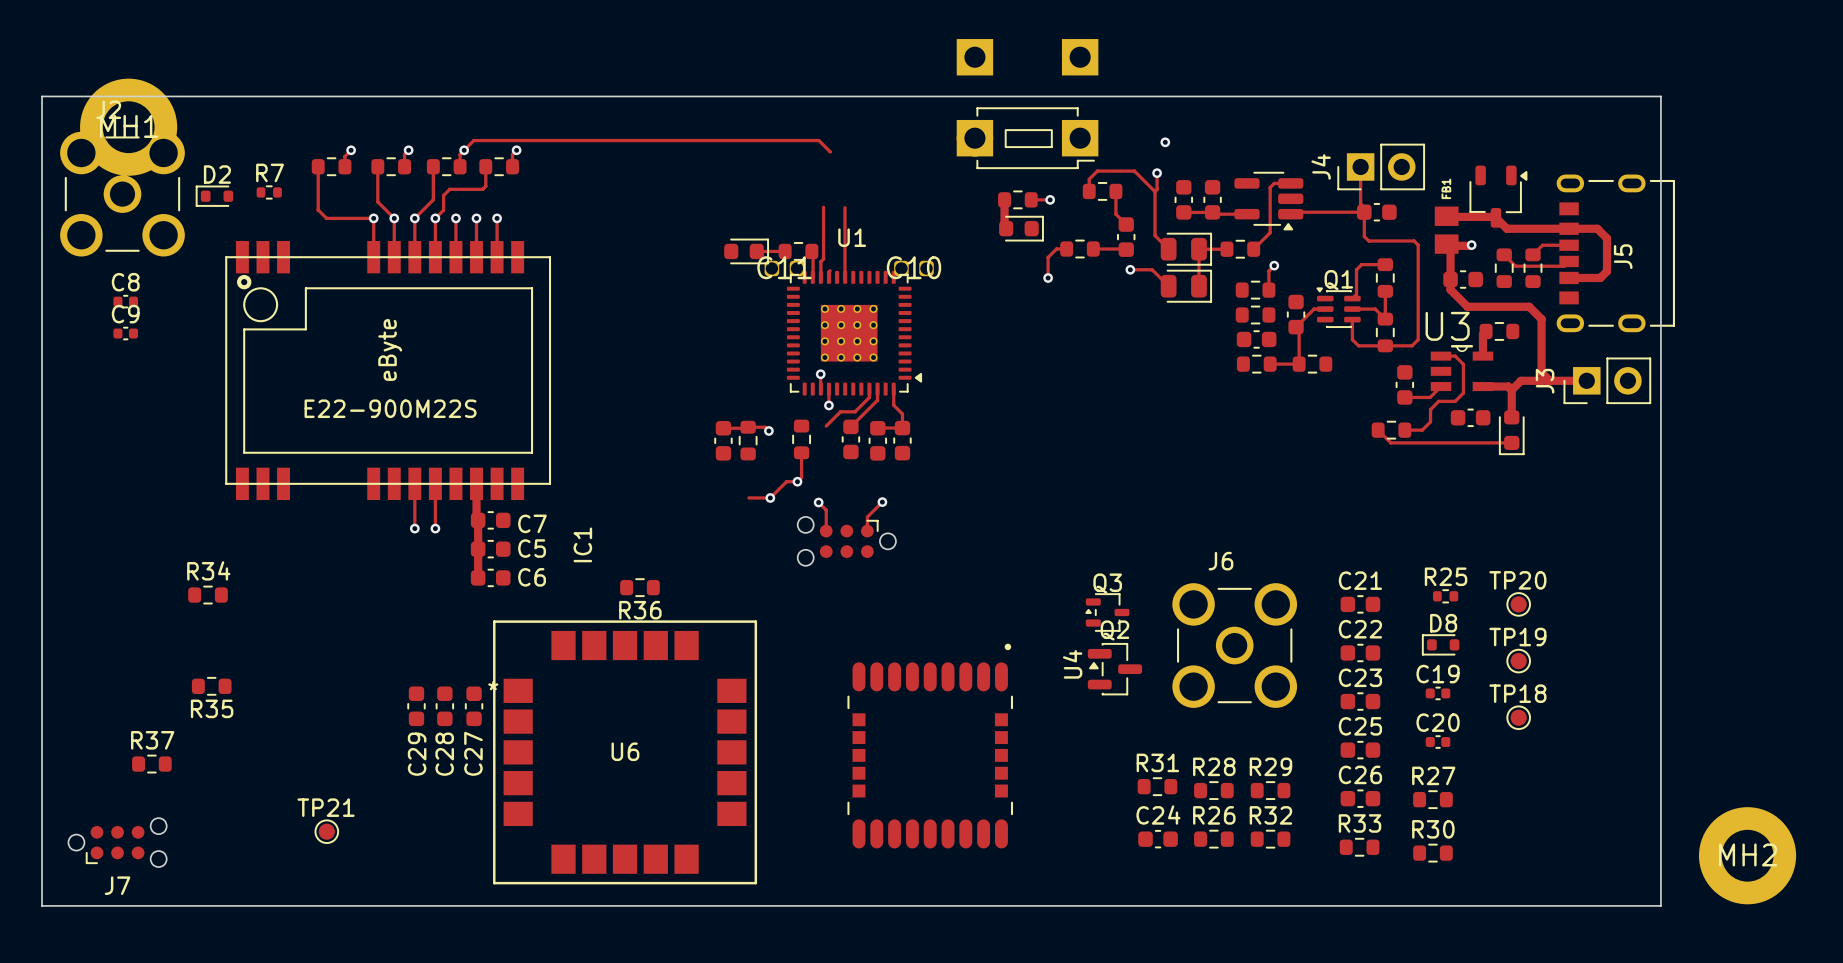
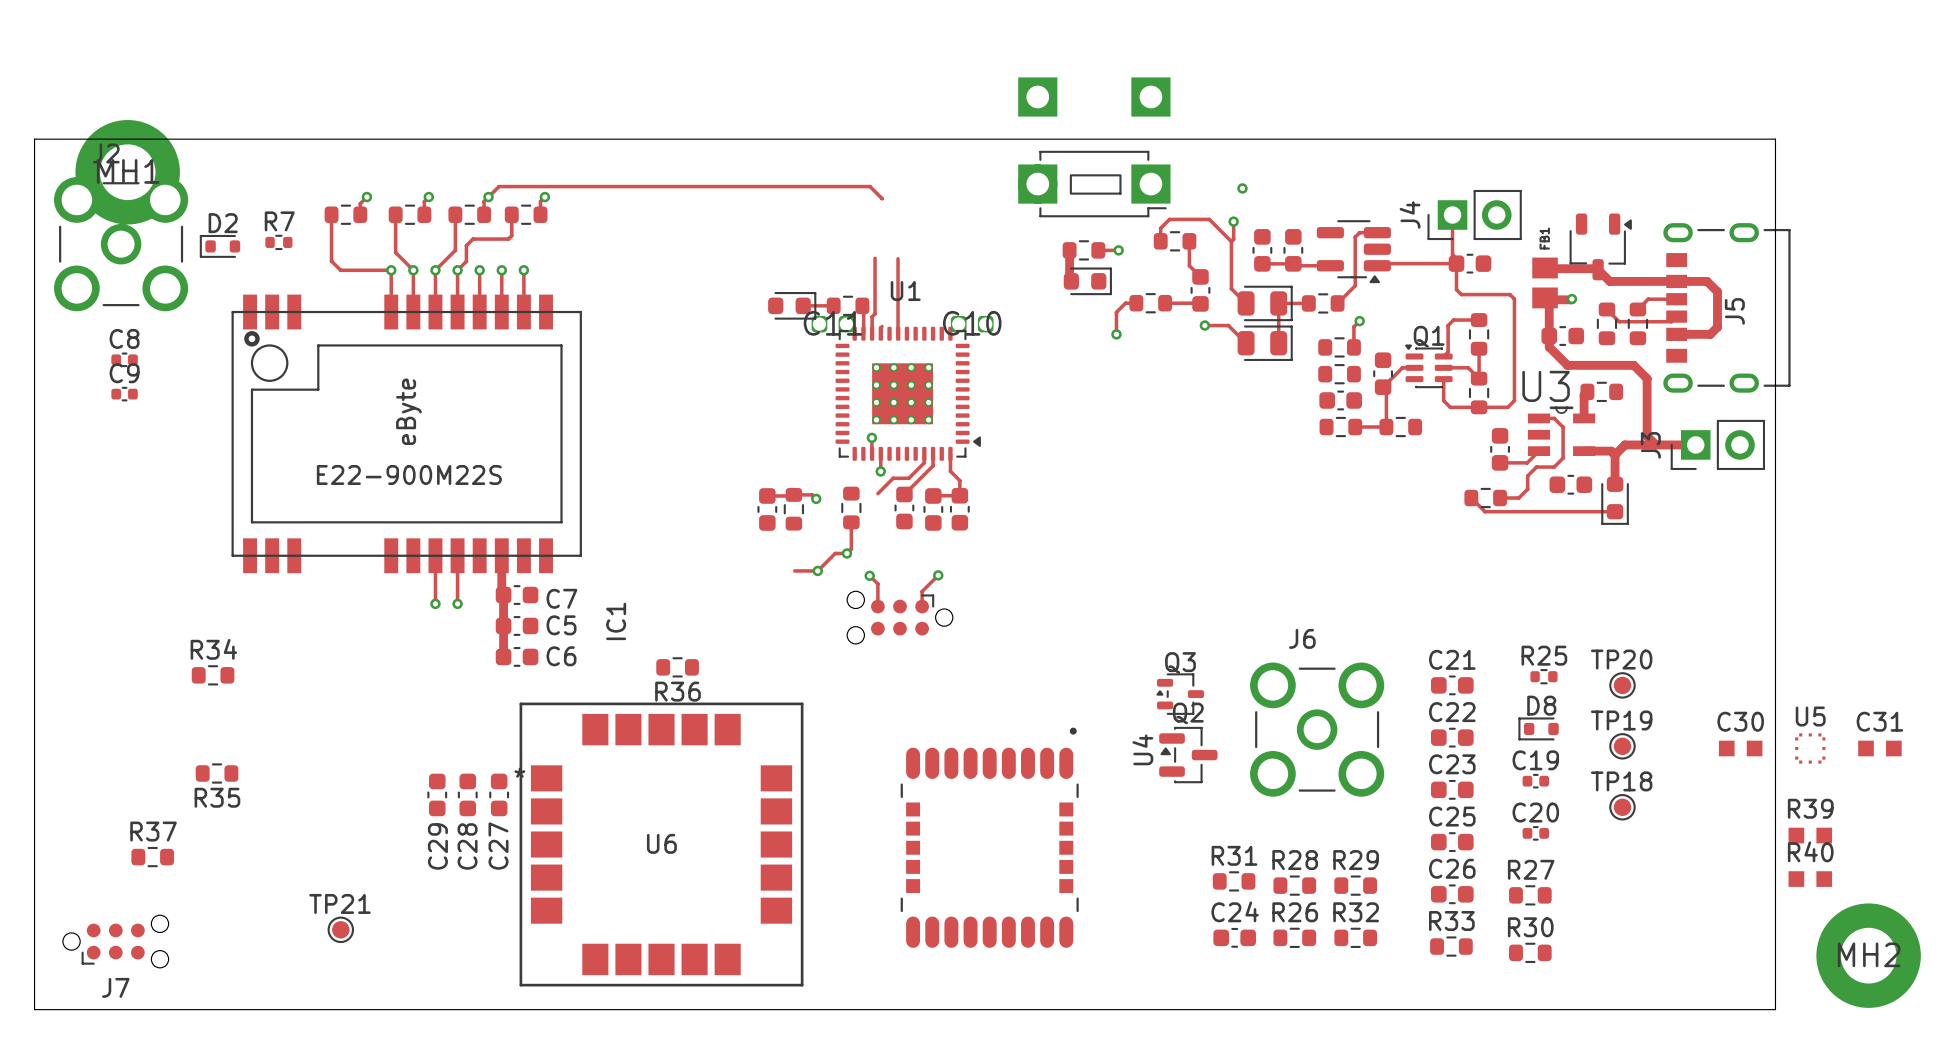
C30: none -> (1740, 748)
U5: none -> (1810, 748)
C31: none -> (1879, 748)
R39: none -> (1810, 835)
R40: none -> (1810, 879)

